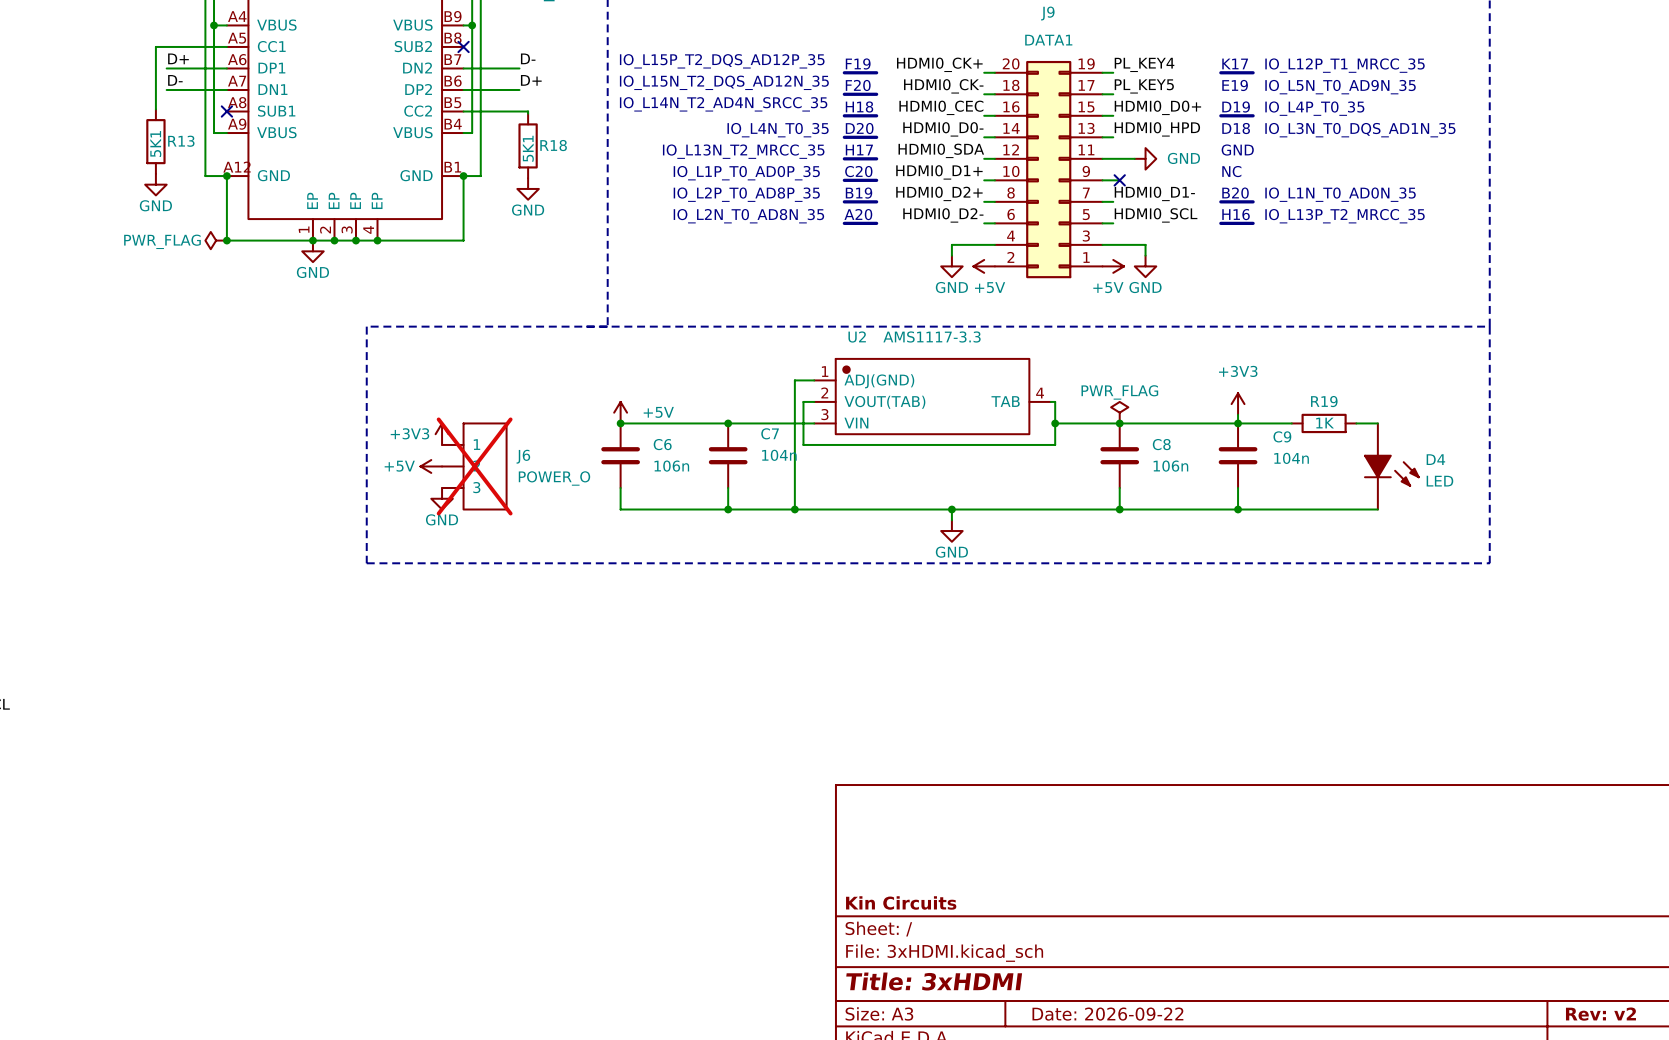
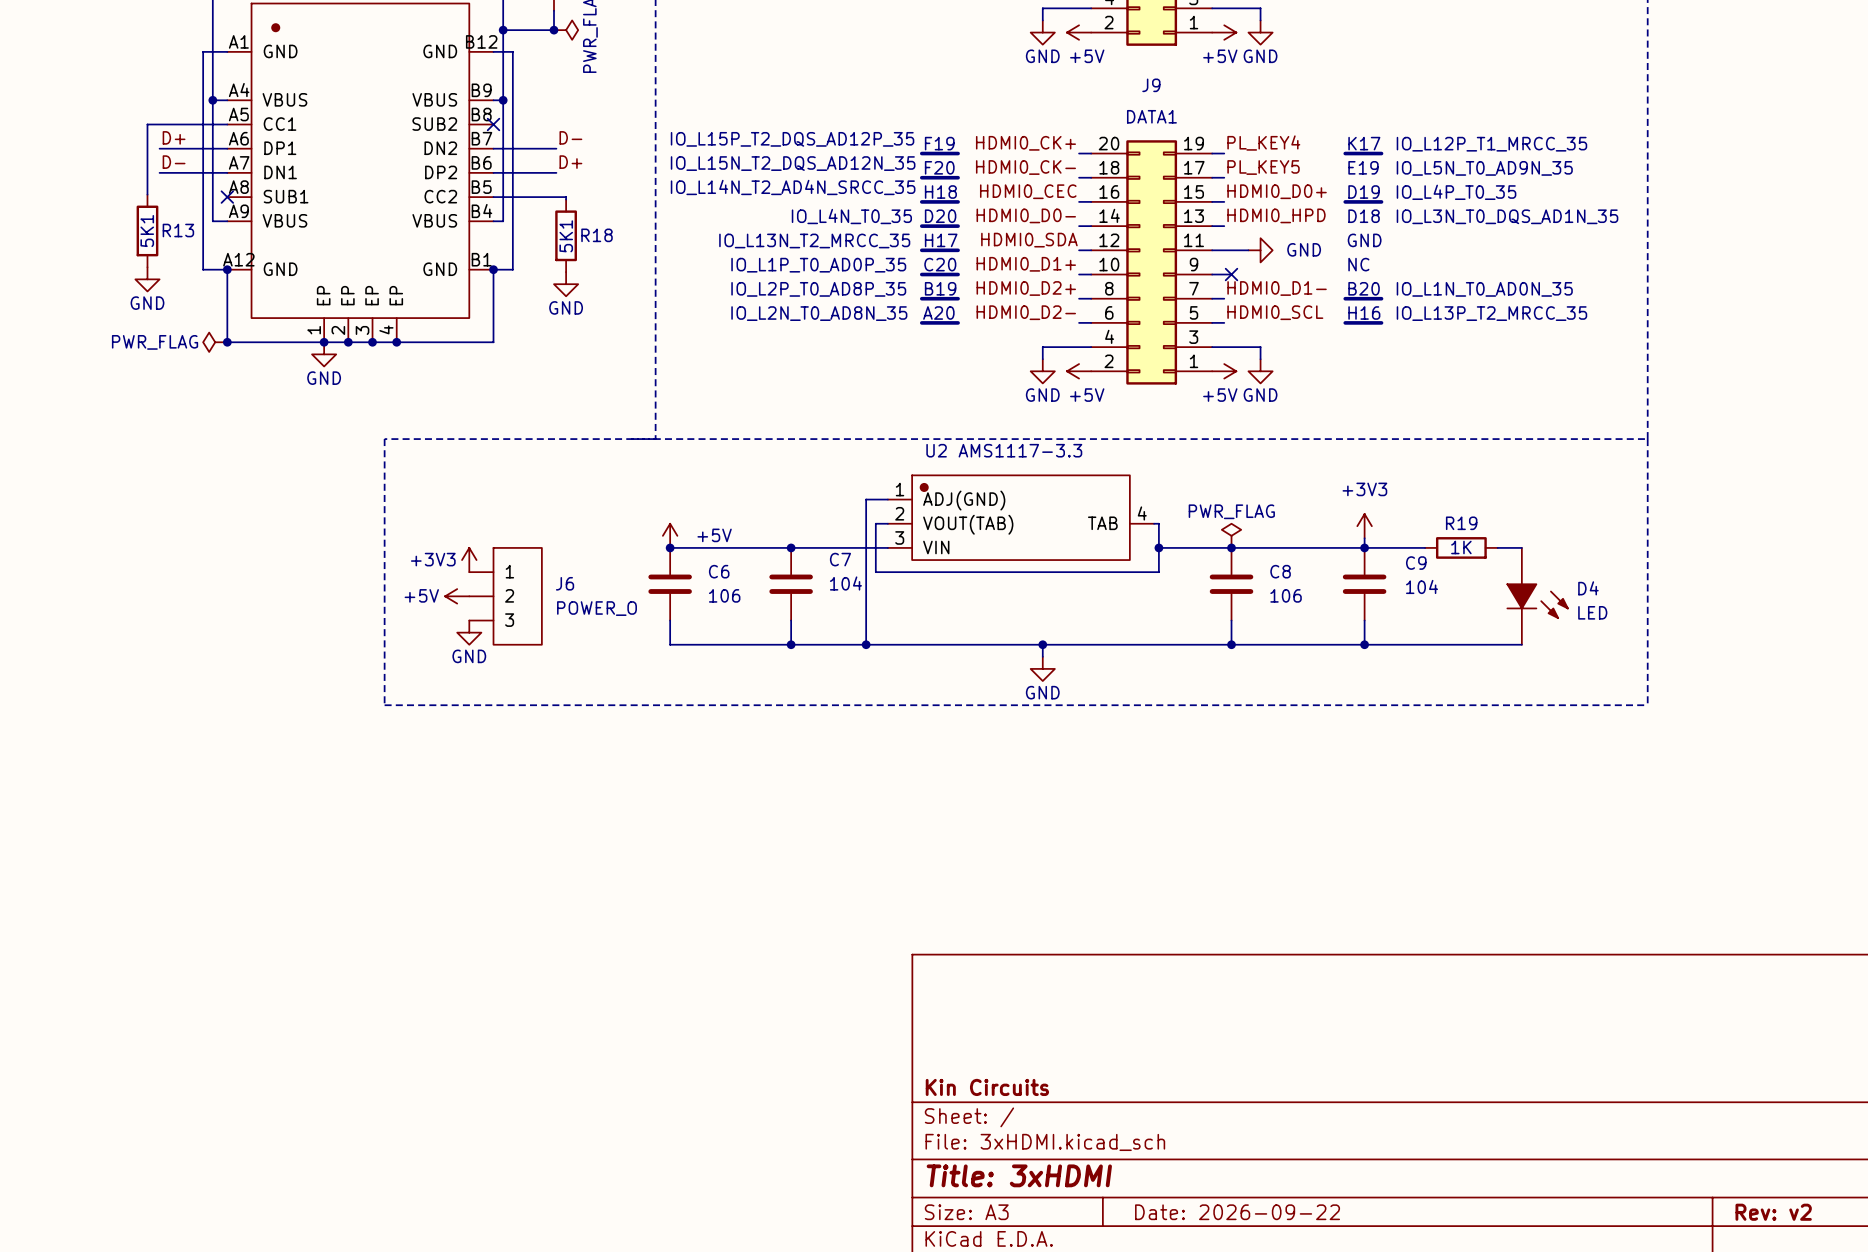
C7 value: 104n (779, 455) -> 104 (845, 583)
C9 value: 104n (1291, 458) -> 104 (1422, 586)
J6 do-not-place cross: (474, 466) -> none
C6 value: 106n (671, 466) -> 106 (724, 595)
C8 value: 106n (1170, 466) -> 106 (1286, 595)

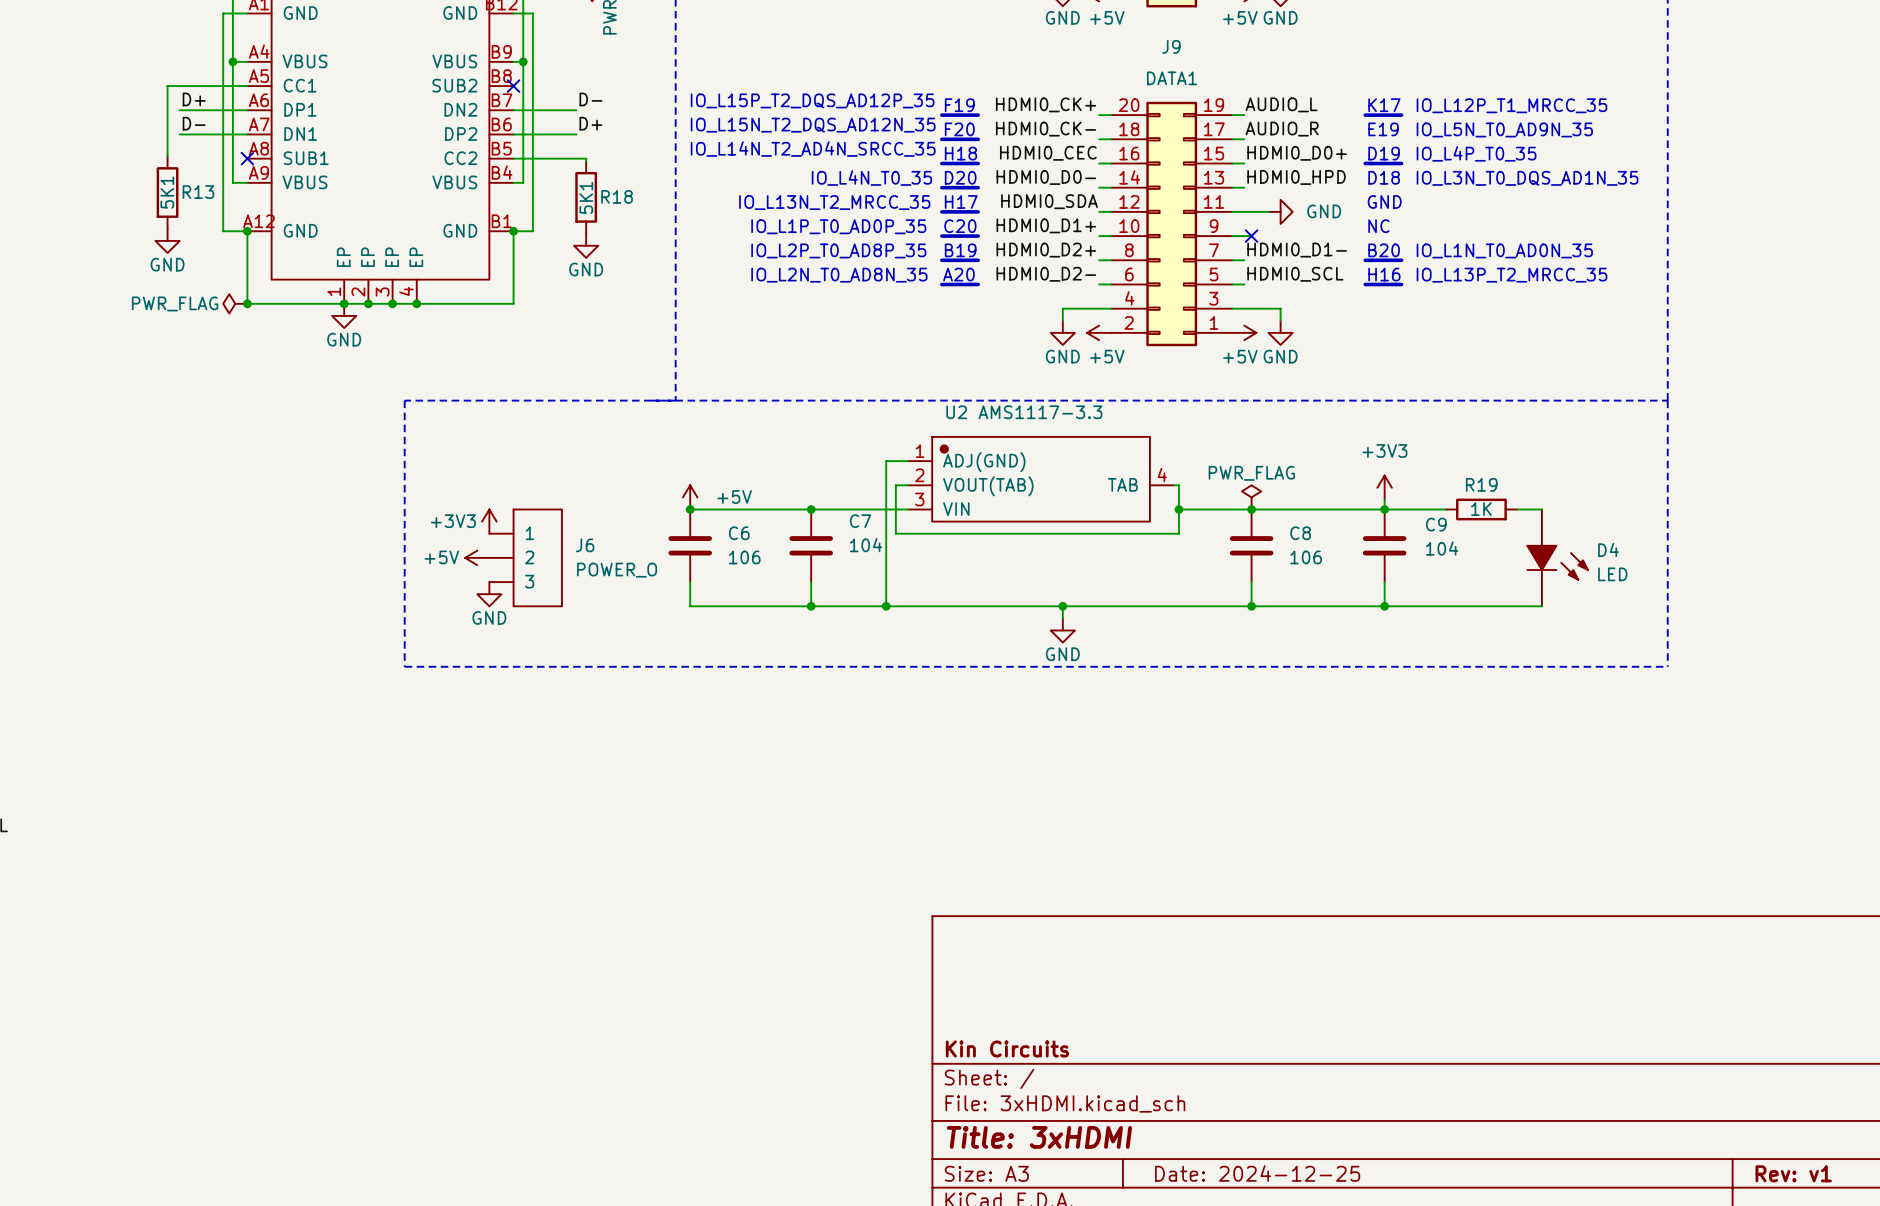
label: PL_KEY4 (1263, 143) -> AUDIO_L (1281, 104)
label: PL_KEY5 (1263, 167) -> AUDIO_R (1282, 129)
title block: Date: 2026-09-22 (1237, 1212) -> Date: 2024-12-25 (1257, 1173)
title block: Rev: v2 (1773, 1212) -> Rev: v1 (1793, 1173)

